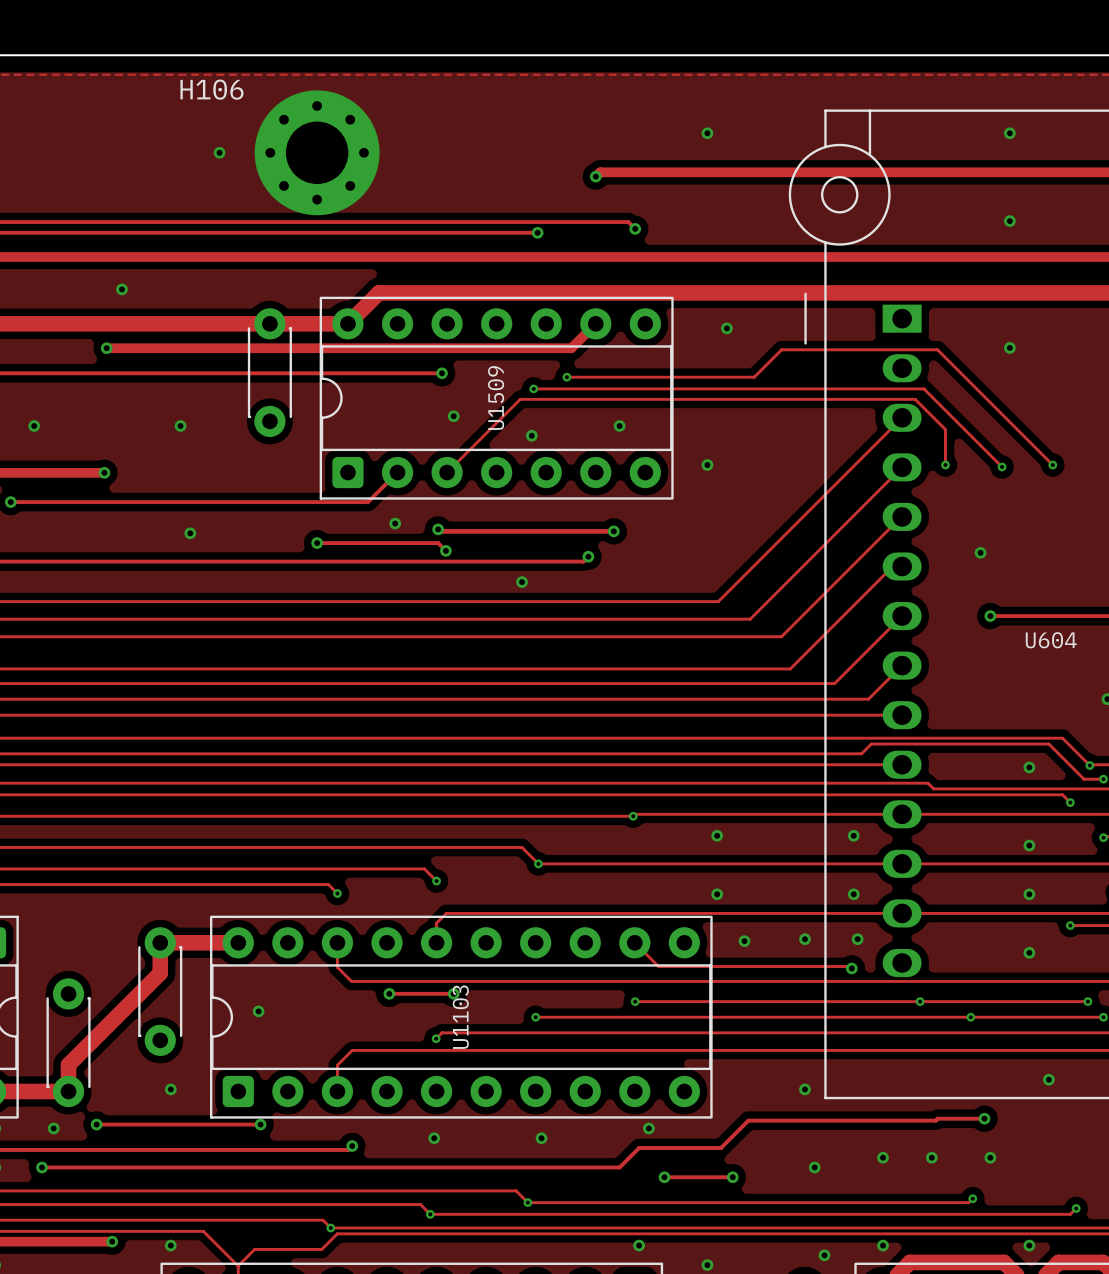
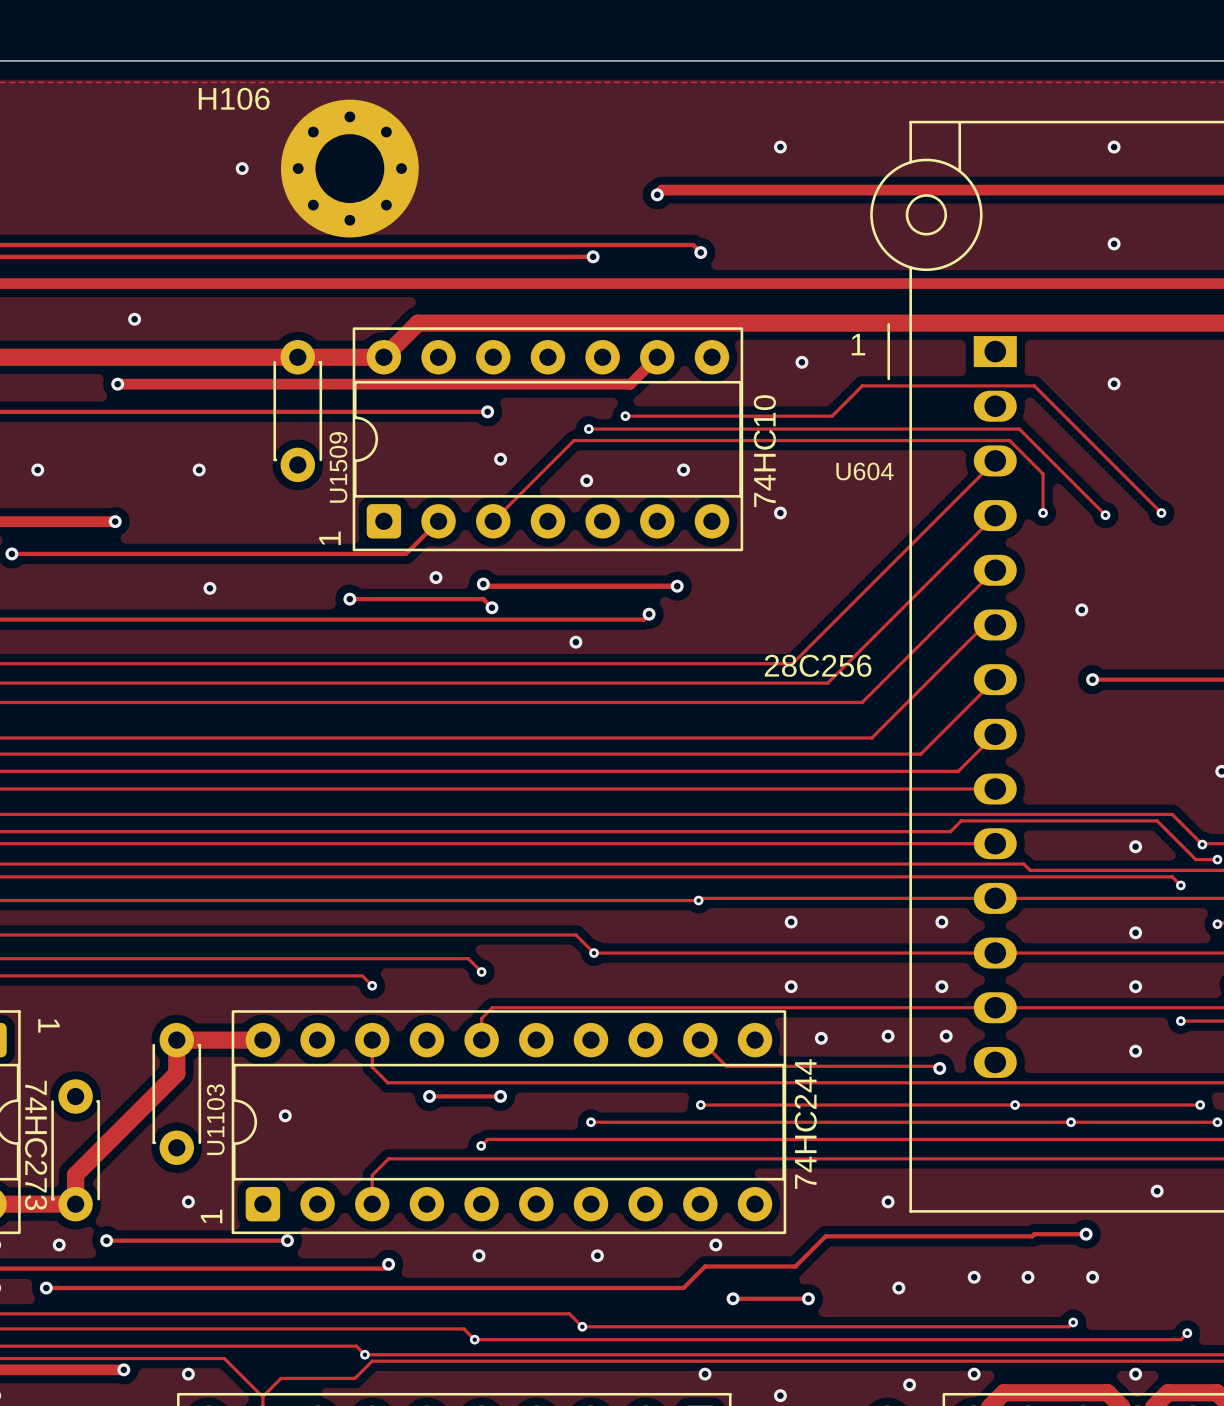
text: none -> 1 (858, 344)
U1509 name position: U1509 (496, 398) -> U1509 (338, 467)
text: none -> 74HC10 (764, 451)
text: none -> 1 (330, 538)
text: none -> 28C256 (818, 665)
U604 name position: U604 (1051, 640) -> U604 (864, 471)
text: none -> 1 (48, 1025)
U1103 name position: U1103 (460, 1017) -> U1103 (215, 1119)
text: none -> 74HC244 (805, 1124)
text: none -> 74HC273 (36, 1145)
text: none -> 1 (211, 1216)

